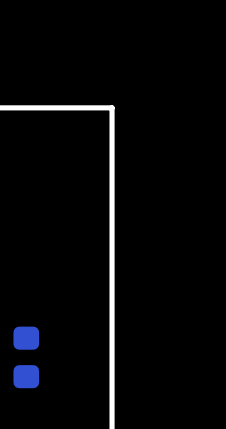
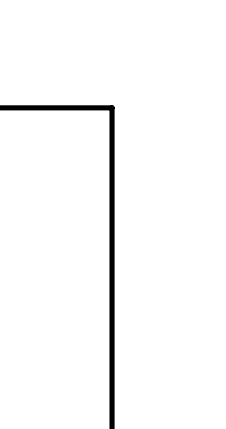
part: (26, 357) -> none

